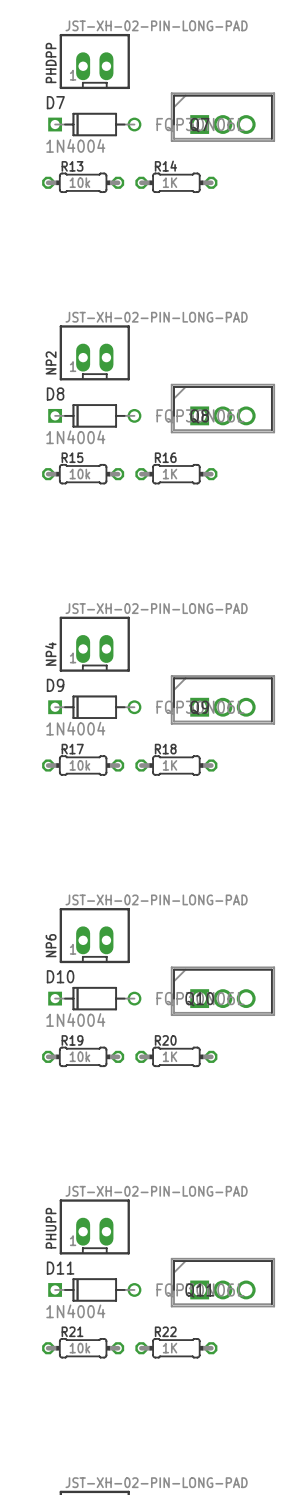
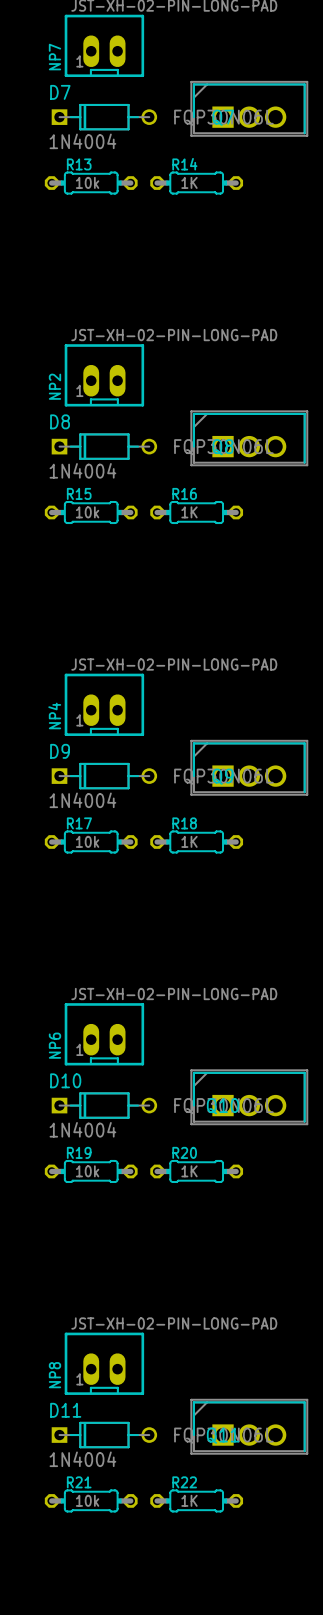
PHDPP name: PHDPP (51, 62) -> NP7 (54, 57)
PHUPP name: PHUPP (51, 1228) -> NP8 (54, 1375)

